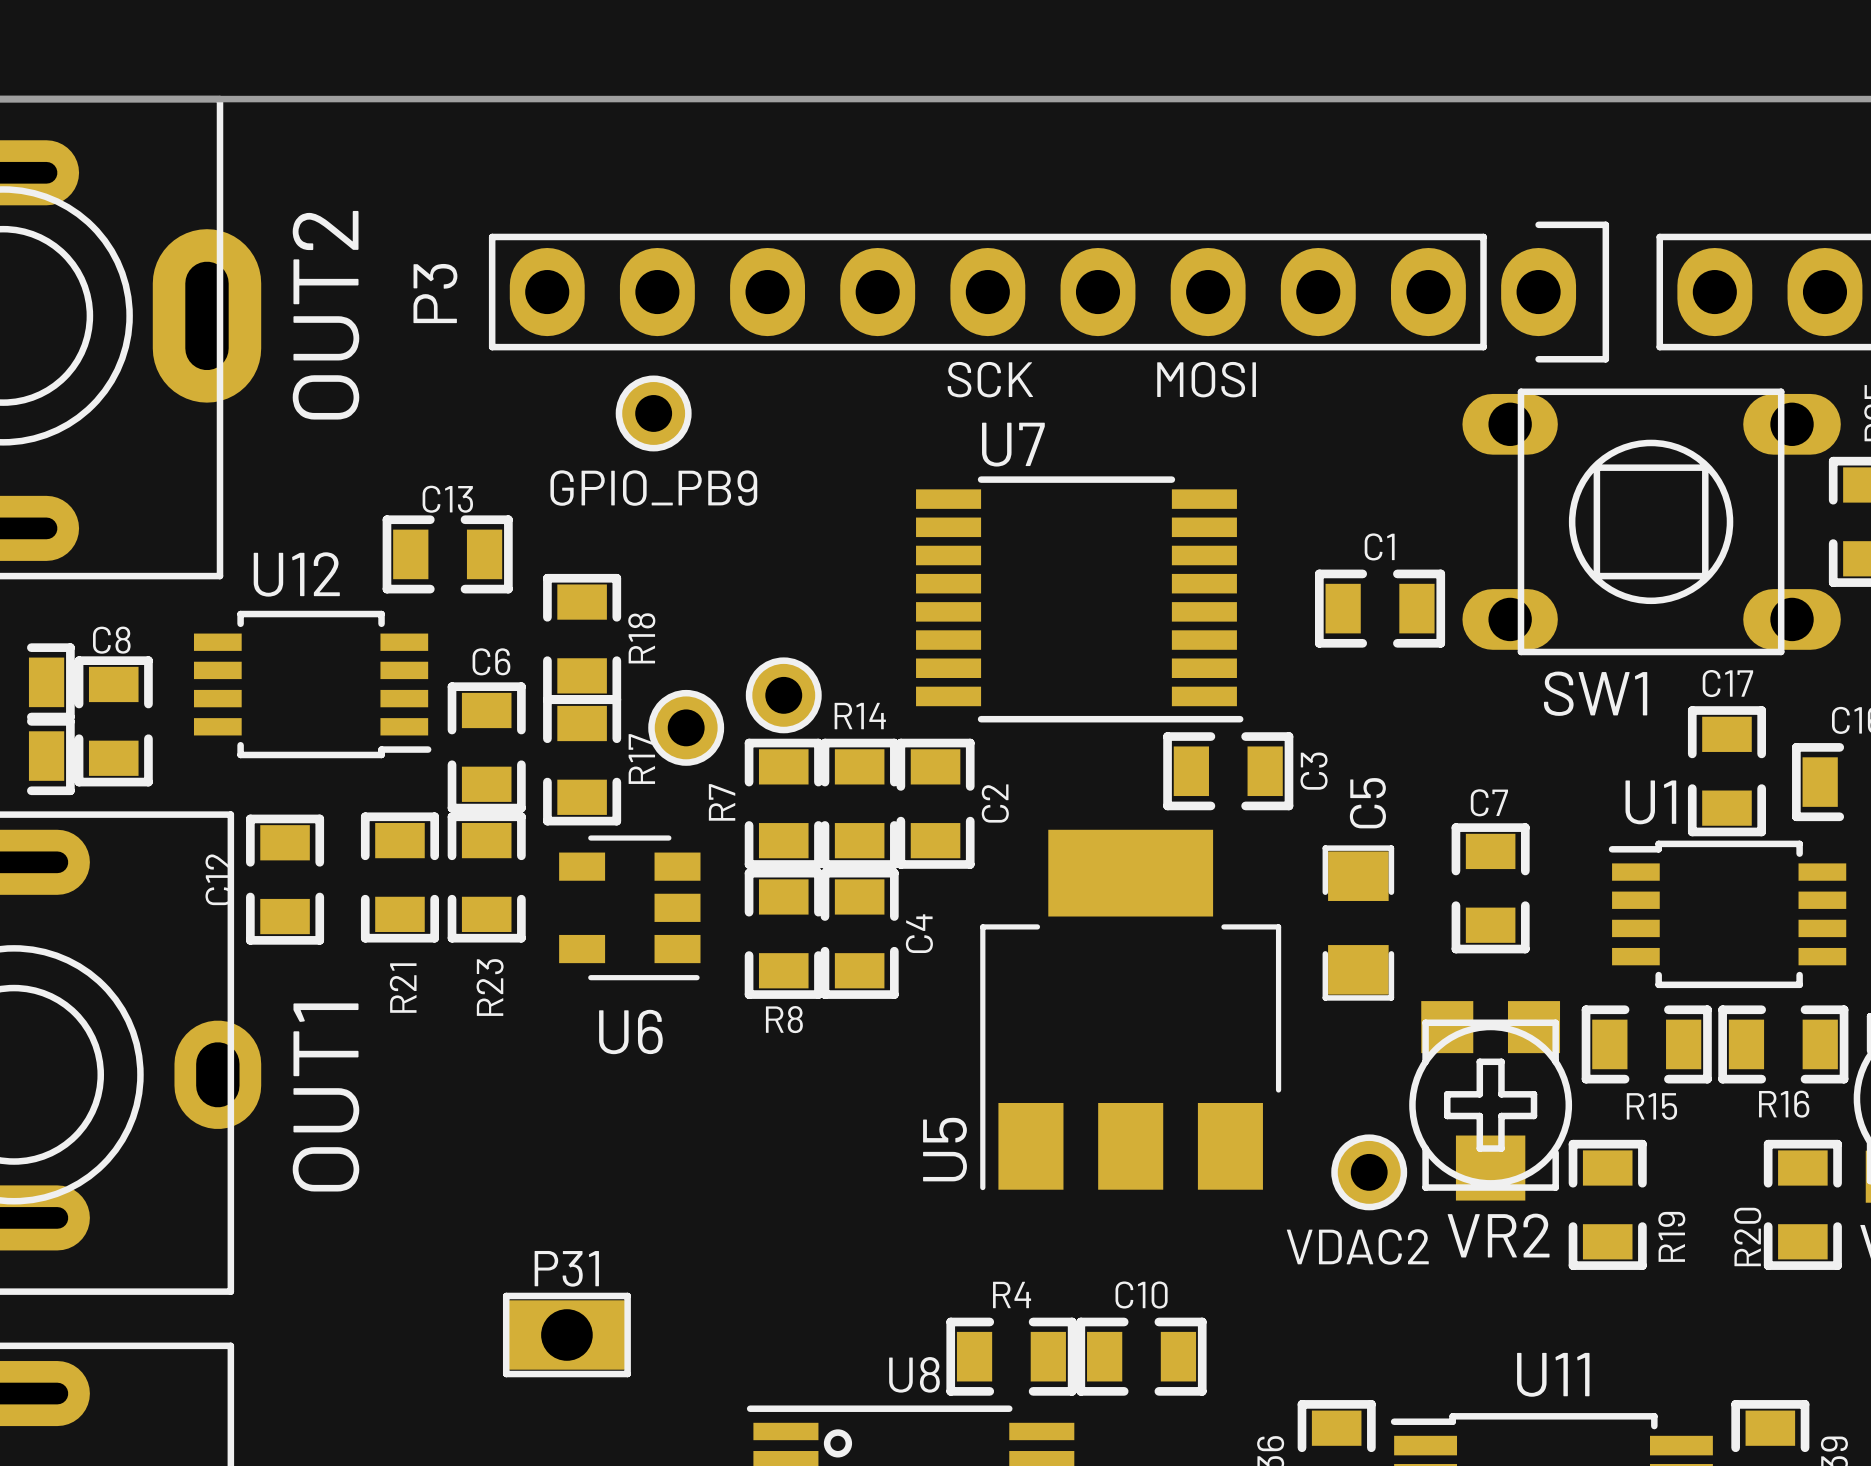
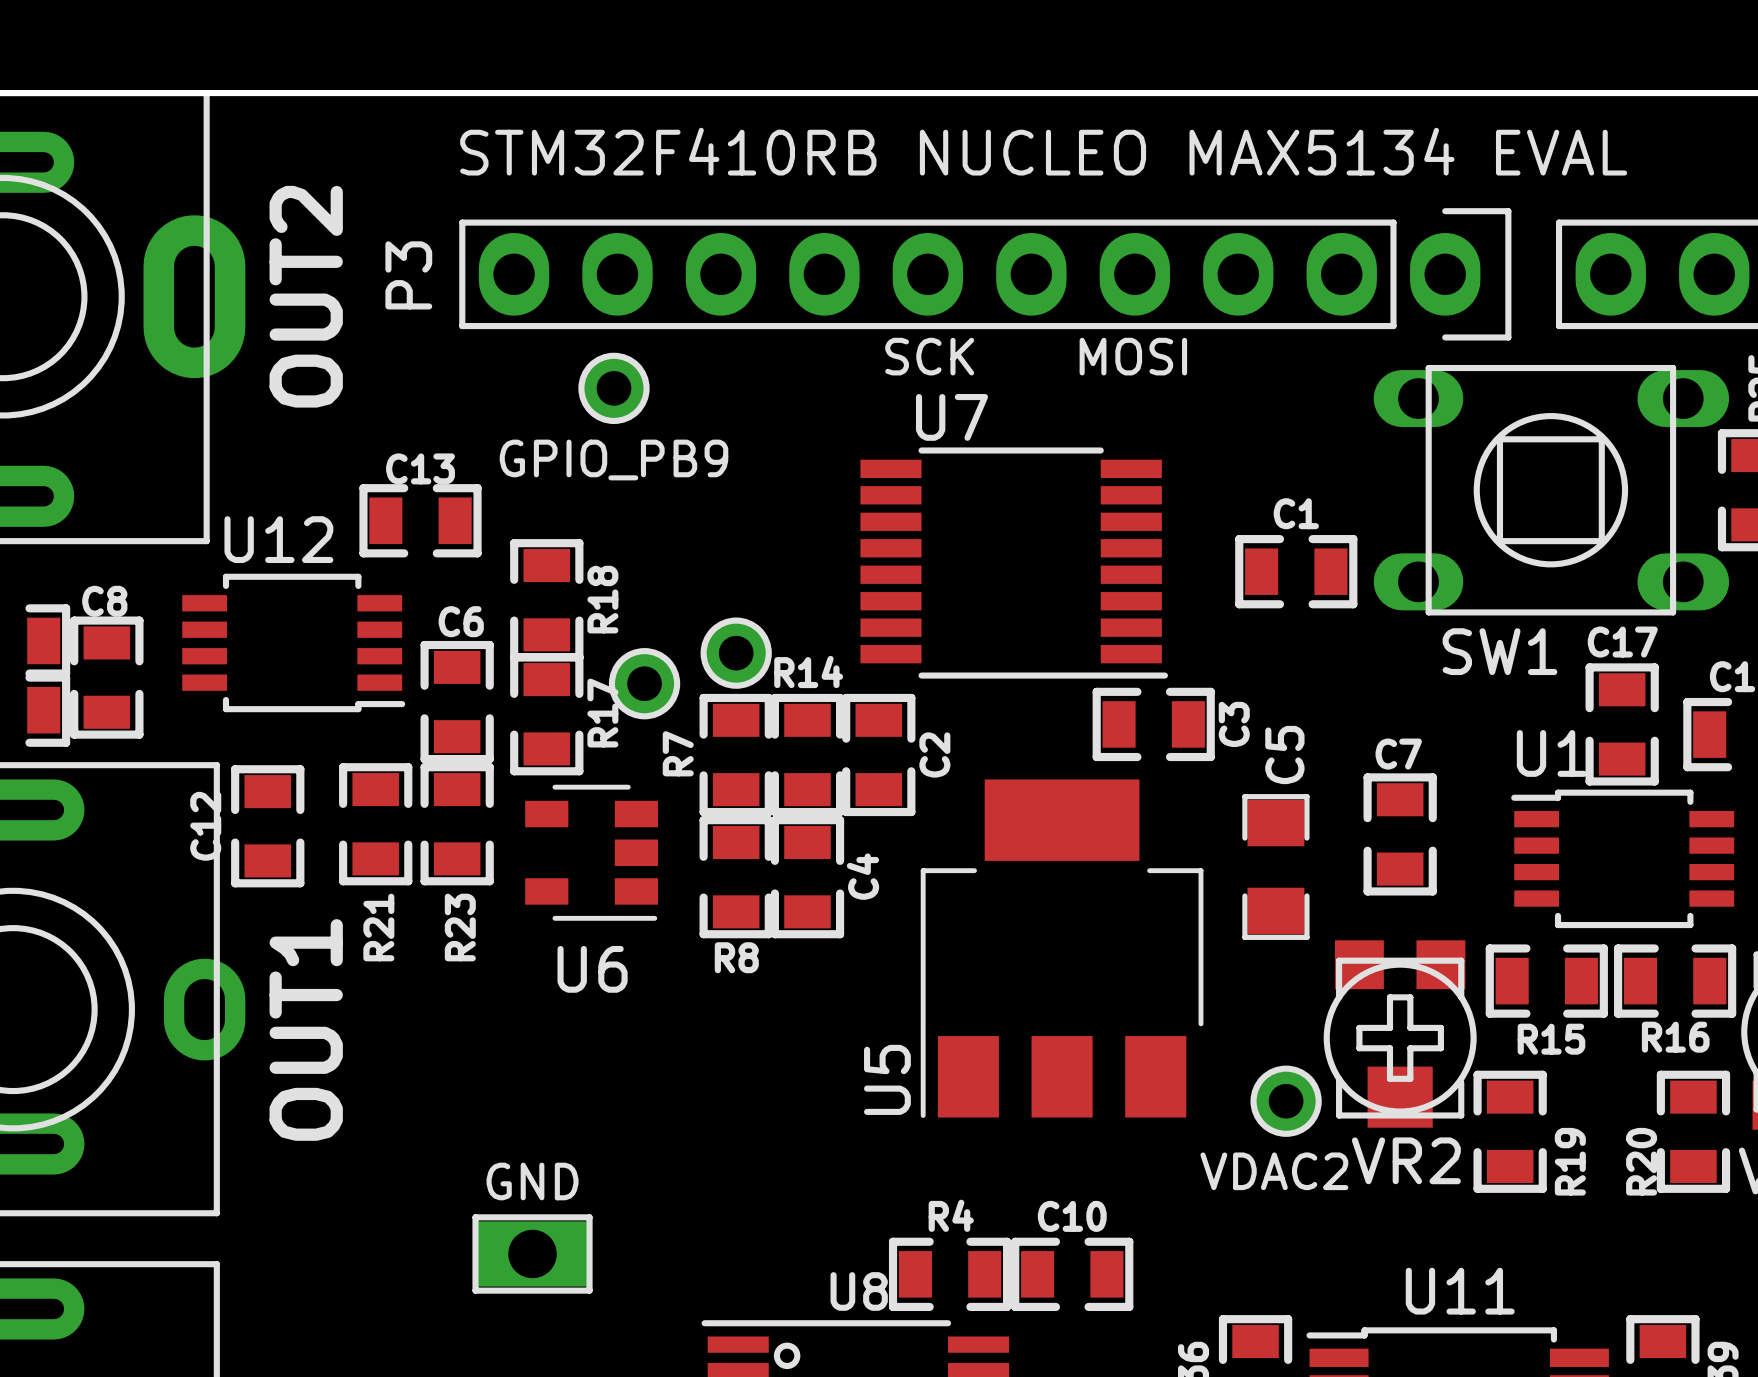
text: none -> STM32F410RB NUCLEO MAX5134 EVAL (1043, 151)
text: none -> GND (532, 1181)
P31 name: P31 (566, 1268) -> none

